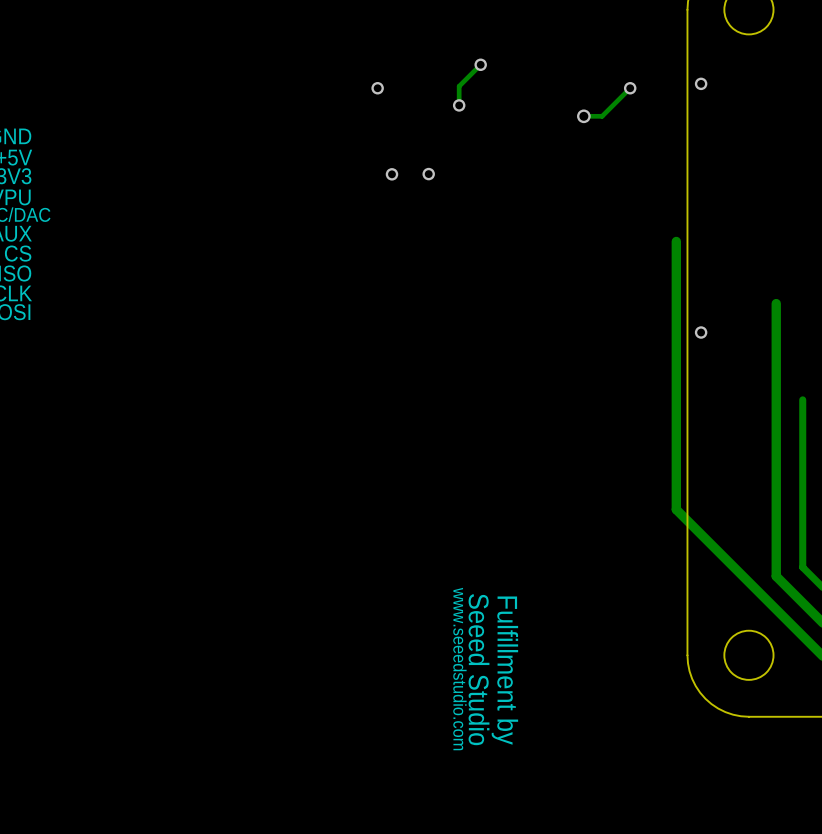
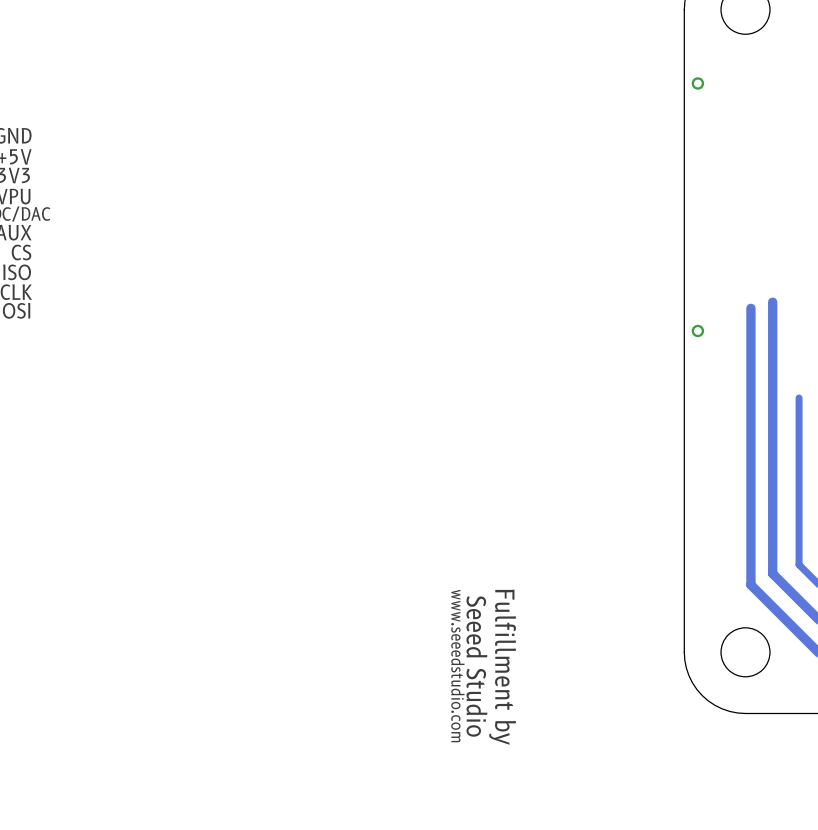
track: (480, 64) (459, 86) (459, 105) -> none
via: (480, 64) -> none
via: (377, 88) -> none
track: (630, 88) (602, 116) (583, 116) -> none
via: (630, 88) -> none
via: (459, 105) -> none
via: (583, 116) -> none
via: (391, 174) -> none
via: (428, 174) -> none
track: (676, 241) (676, 509) (754, 587) -> (750, 308) (750, 584)

